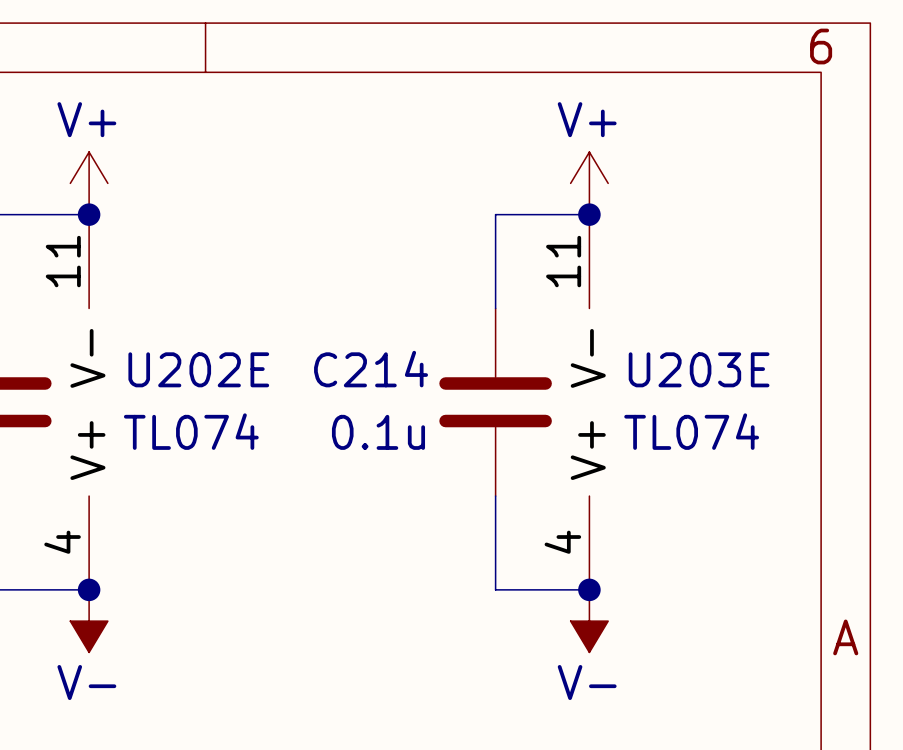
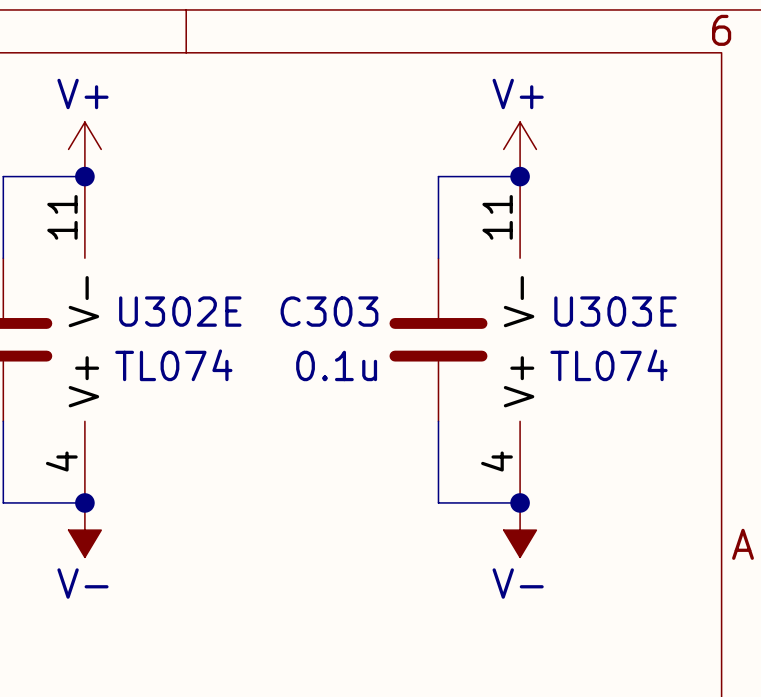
U202E name: U202E (198, 369) -> U302E (180, 311)
C214 name: C214 (371, 369) -> C303 (329, 311)
U203E name: U203E (699, 369) -> U303E (615, 311)

